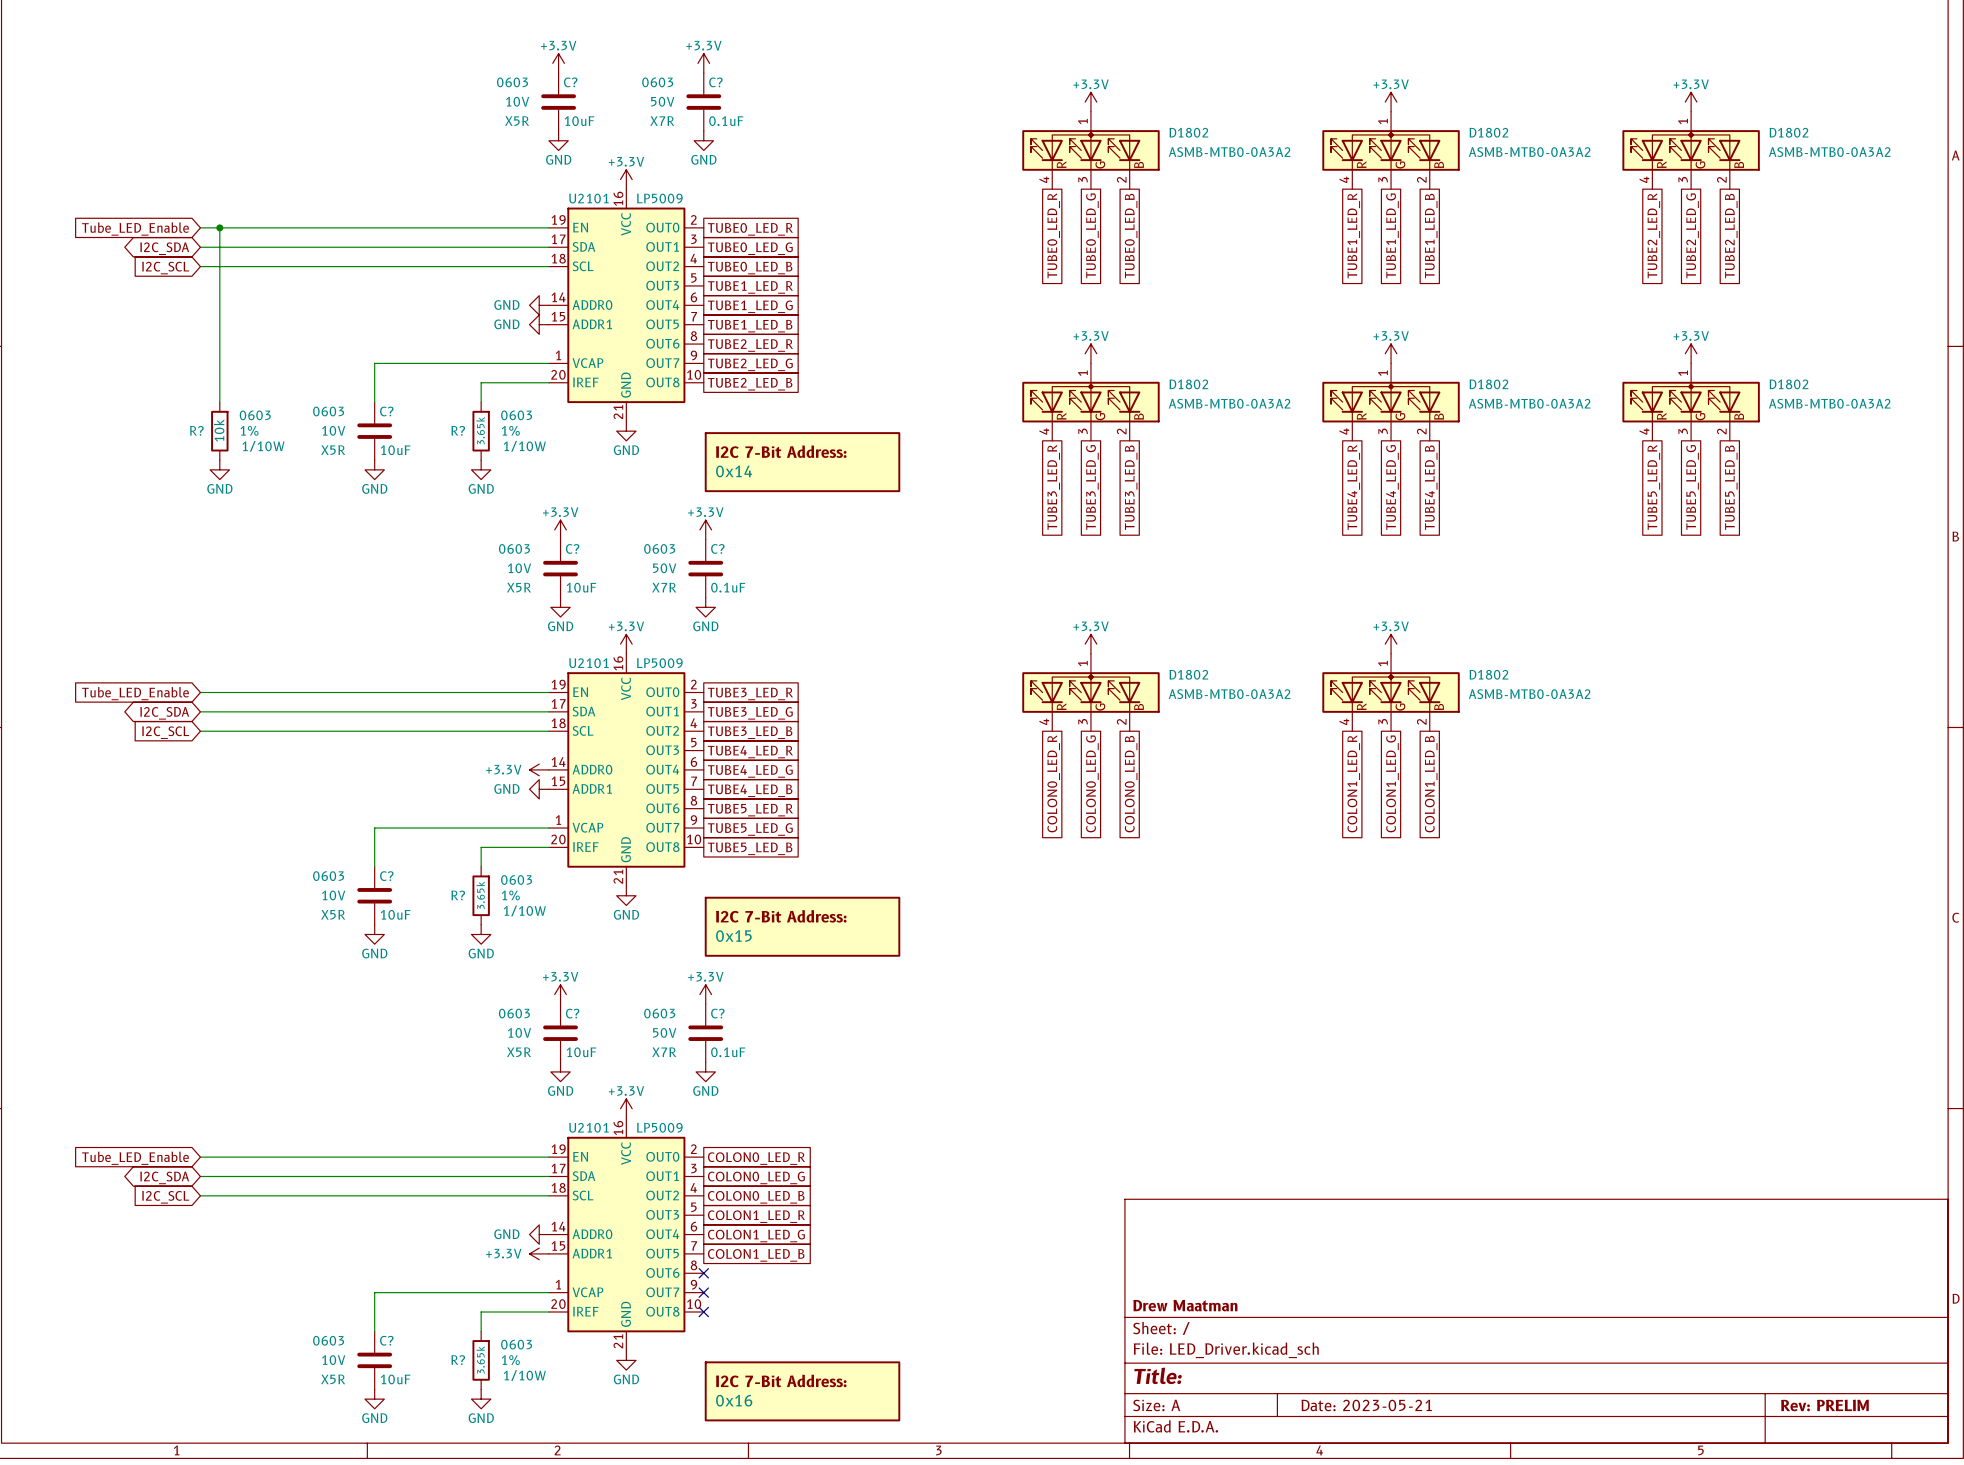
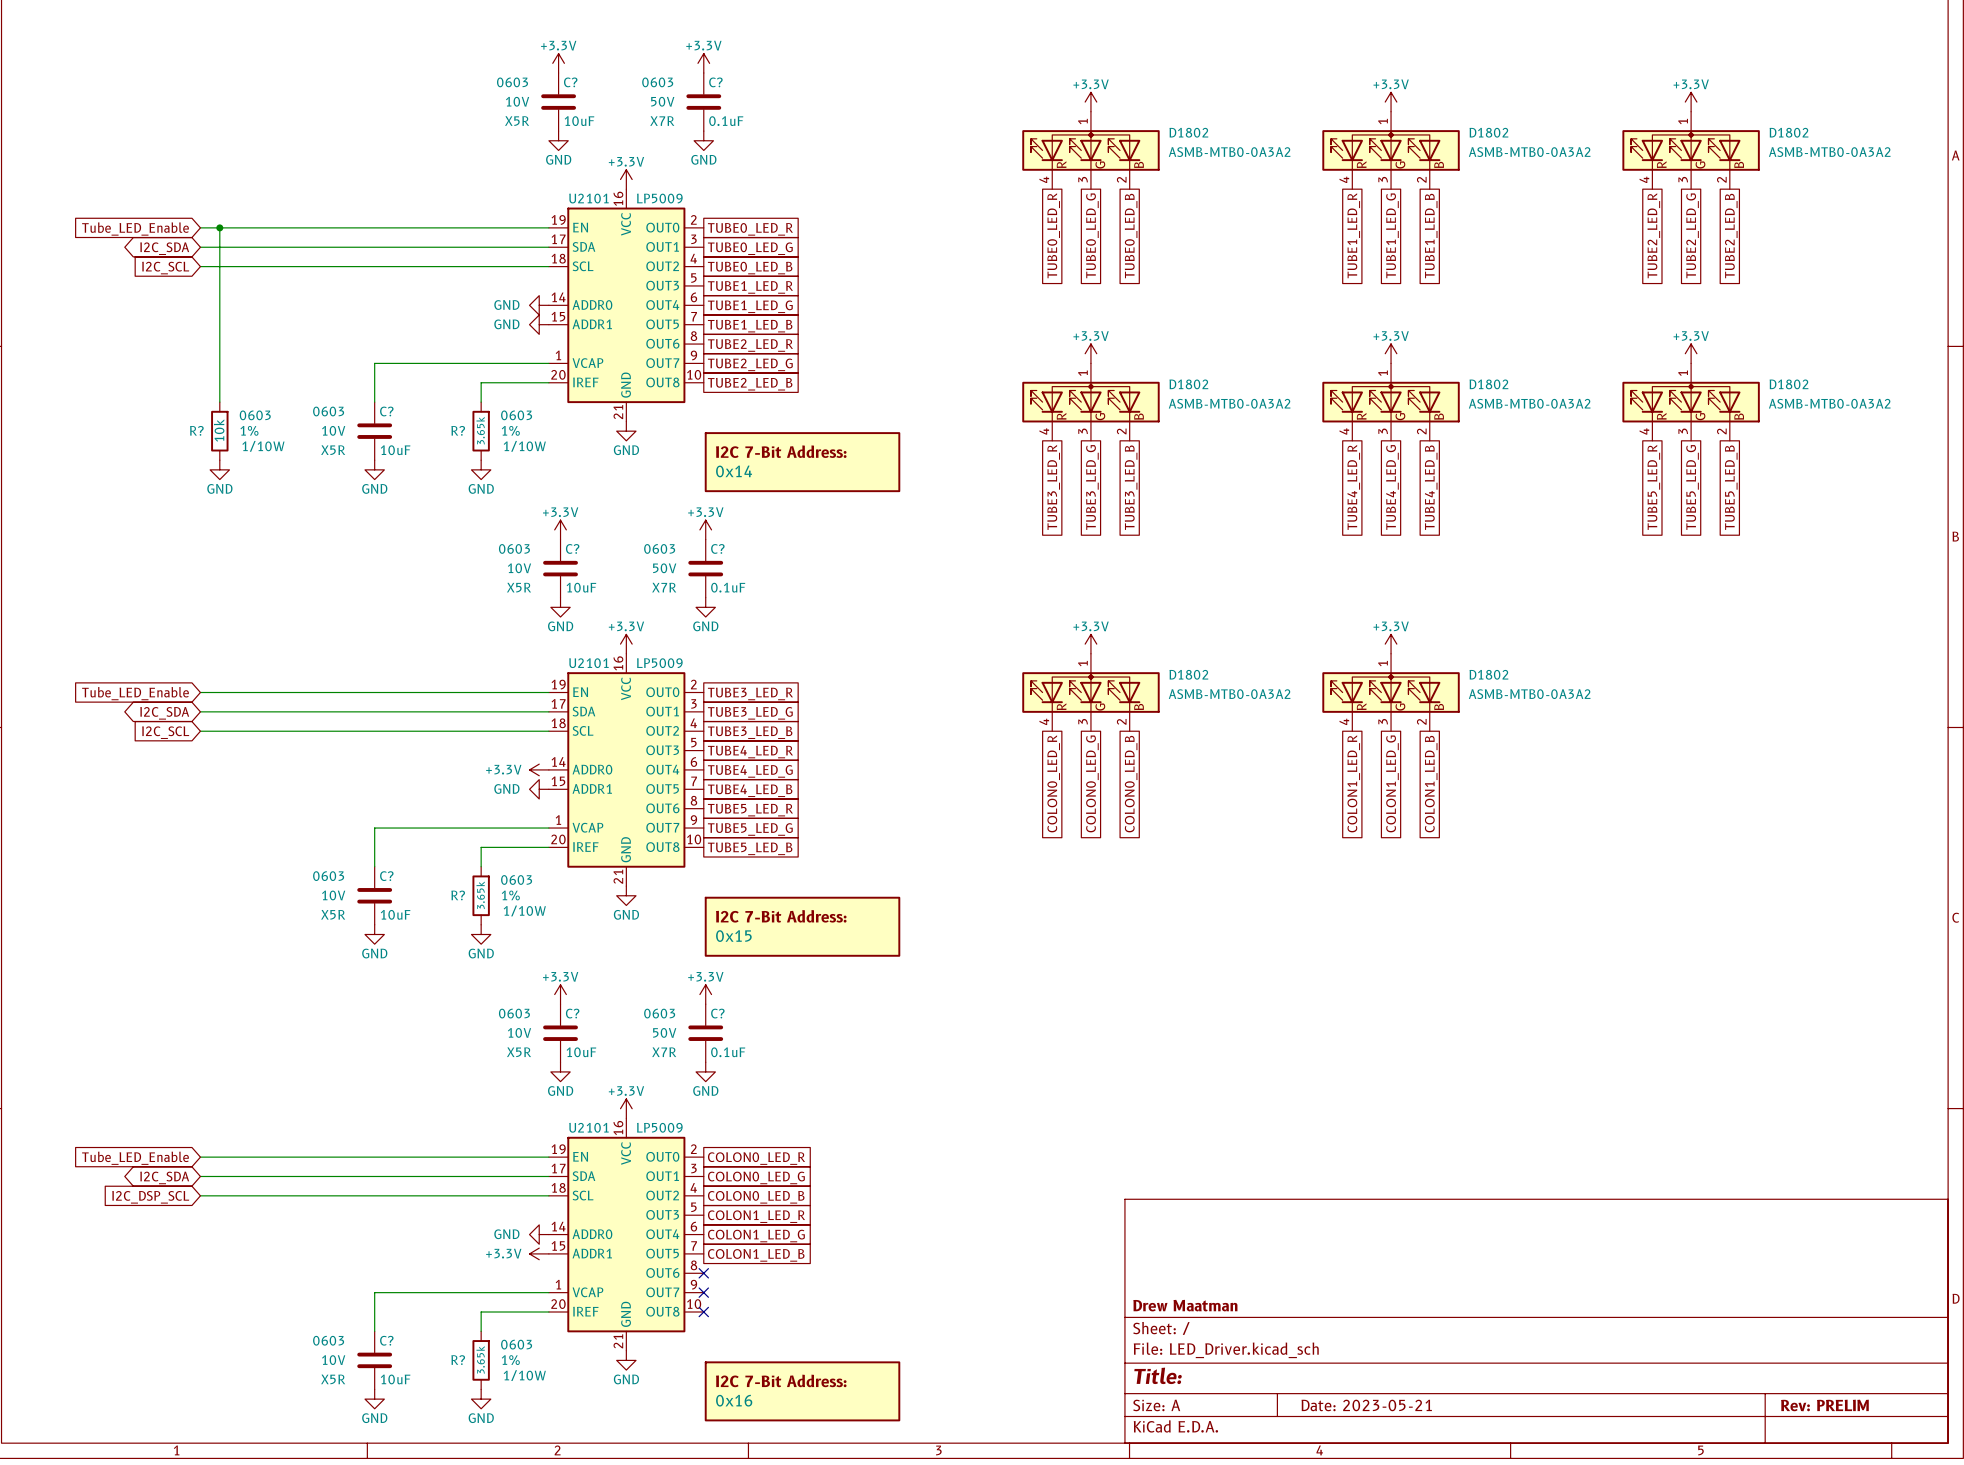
global label: I2C_SCL (165, 1197) -> I2C_DSP_SCL (150, 1197)

